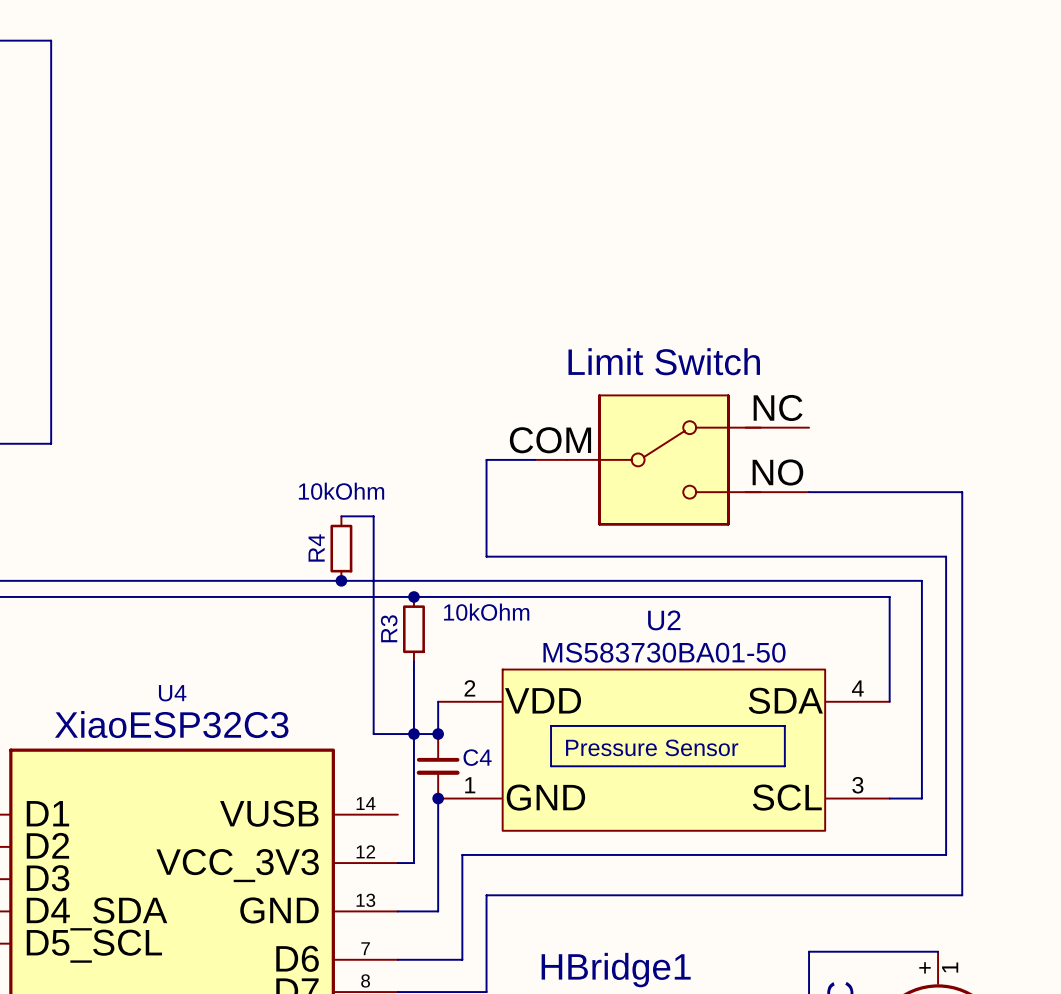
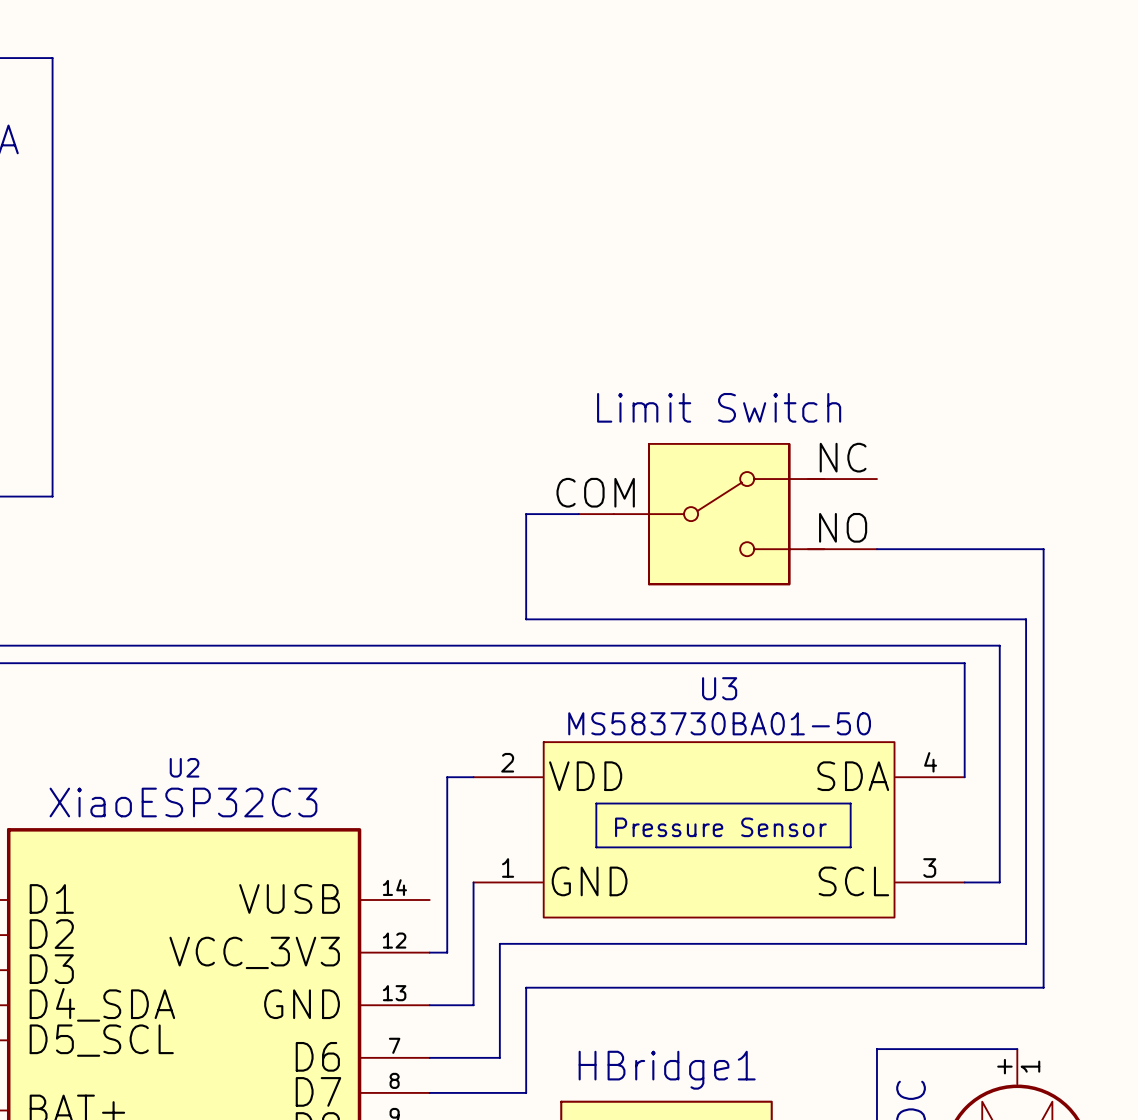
wire: (341, 516) (373, 516) (373, 734) (438, 734) (438, 701) -> none
R4: 10kOhm (341, 548) -> none
junction: (341, 580) -> none
junction: (413, 596) -> none
U2 name: U2 (664, 620) -> U3 (719, 688)
R3: 10kOhm (413, 629) -> none
wire: (413, 661) (413, 701) -> (473, 777) (447, 777)
U4 name: U4 (172, 693) -> U2 (184, 767)
junction: (413, 734) -> none
junction: (438, 734) -> none
C4: (438, 766) -> none
junction: (438, 798) -> none

